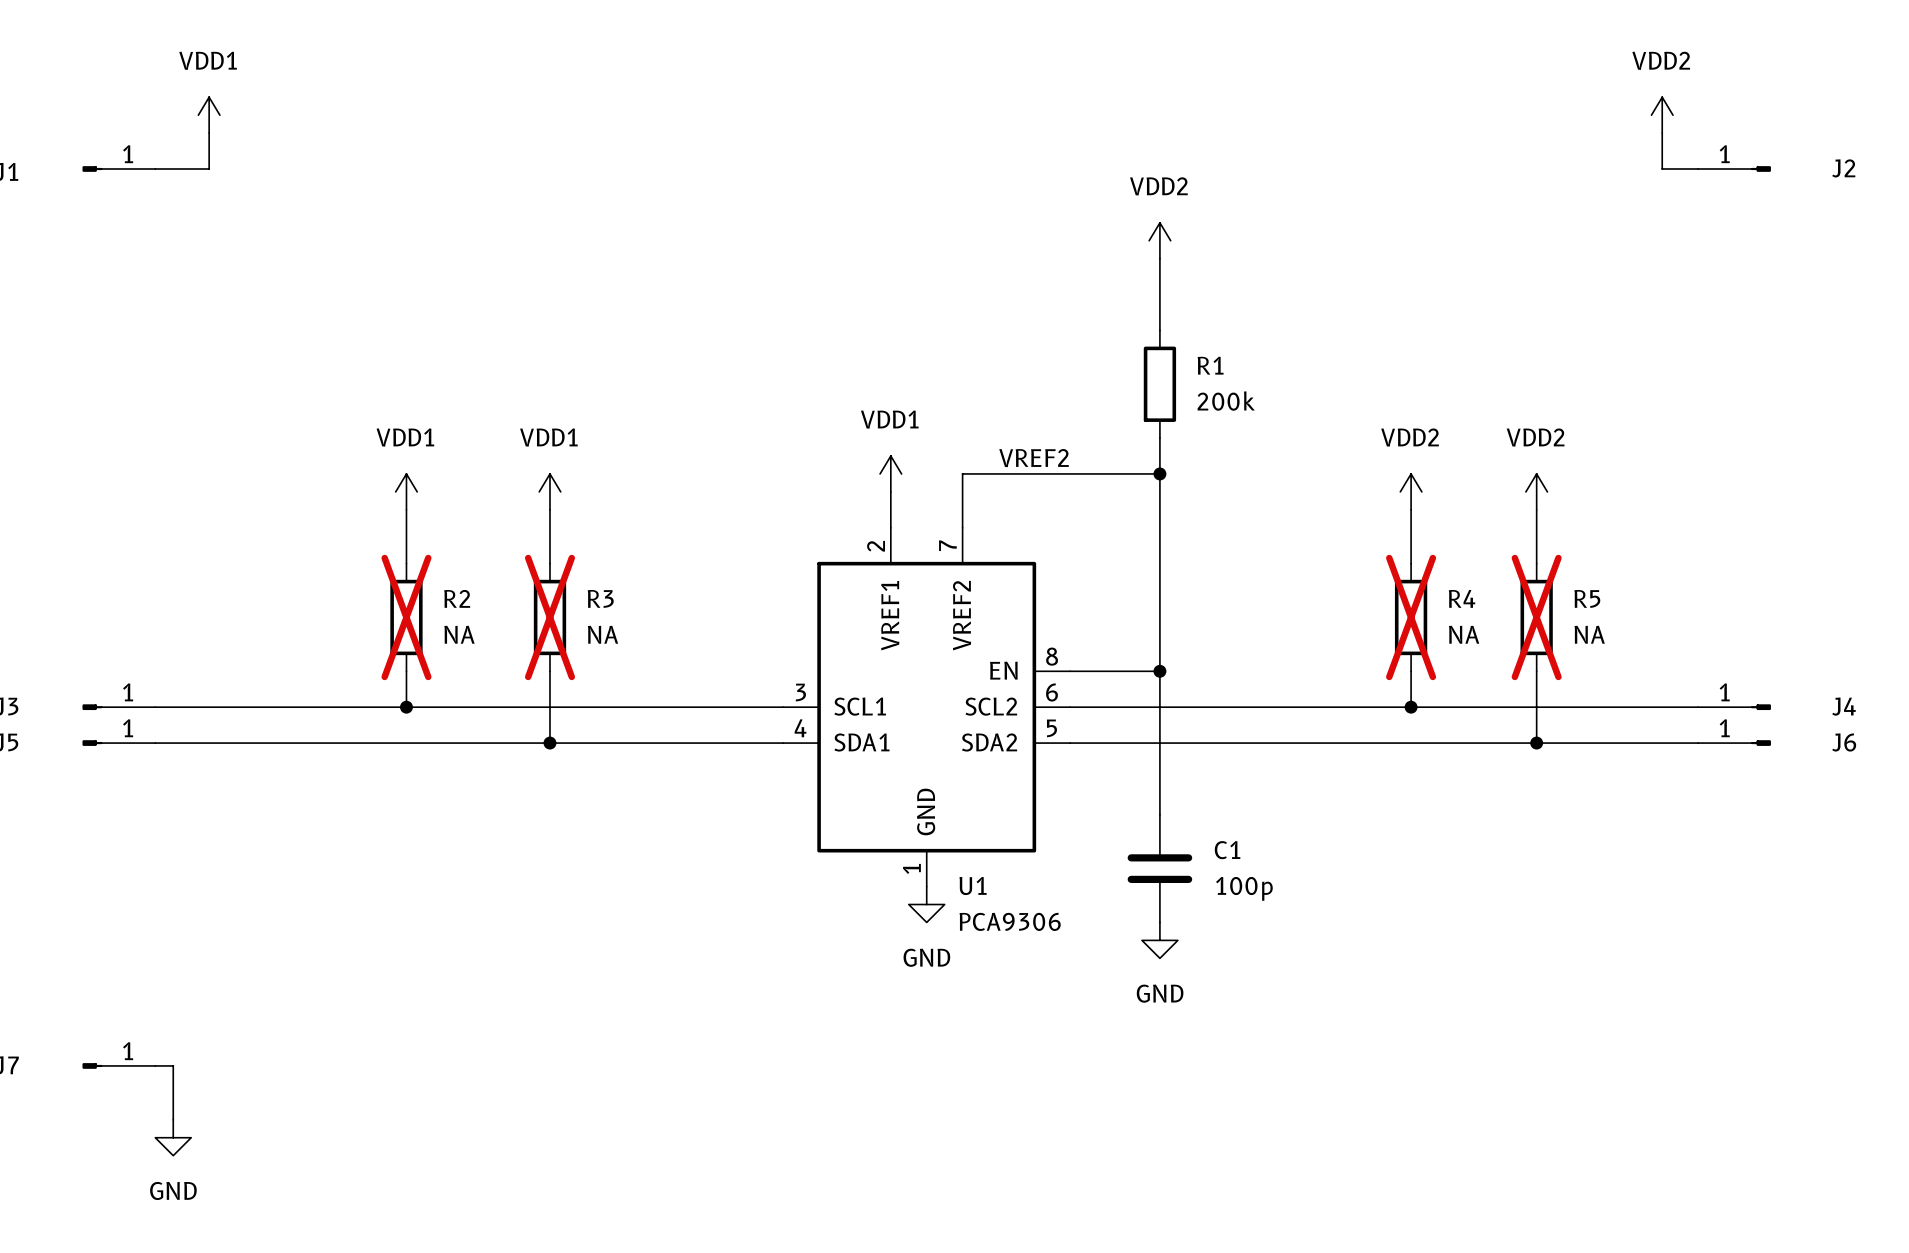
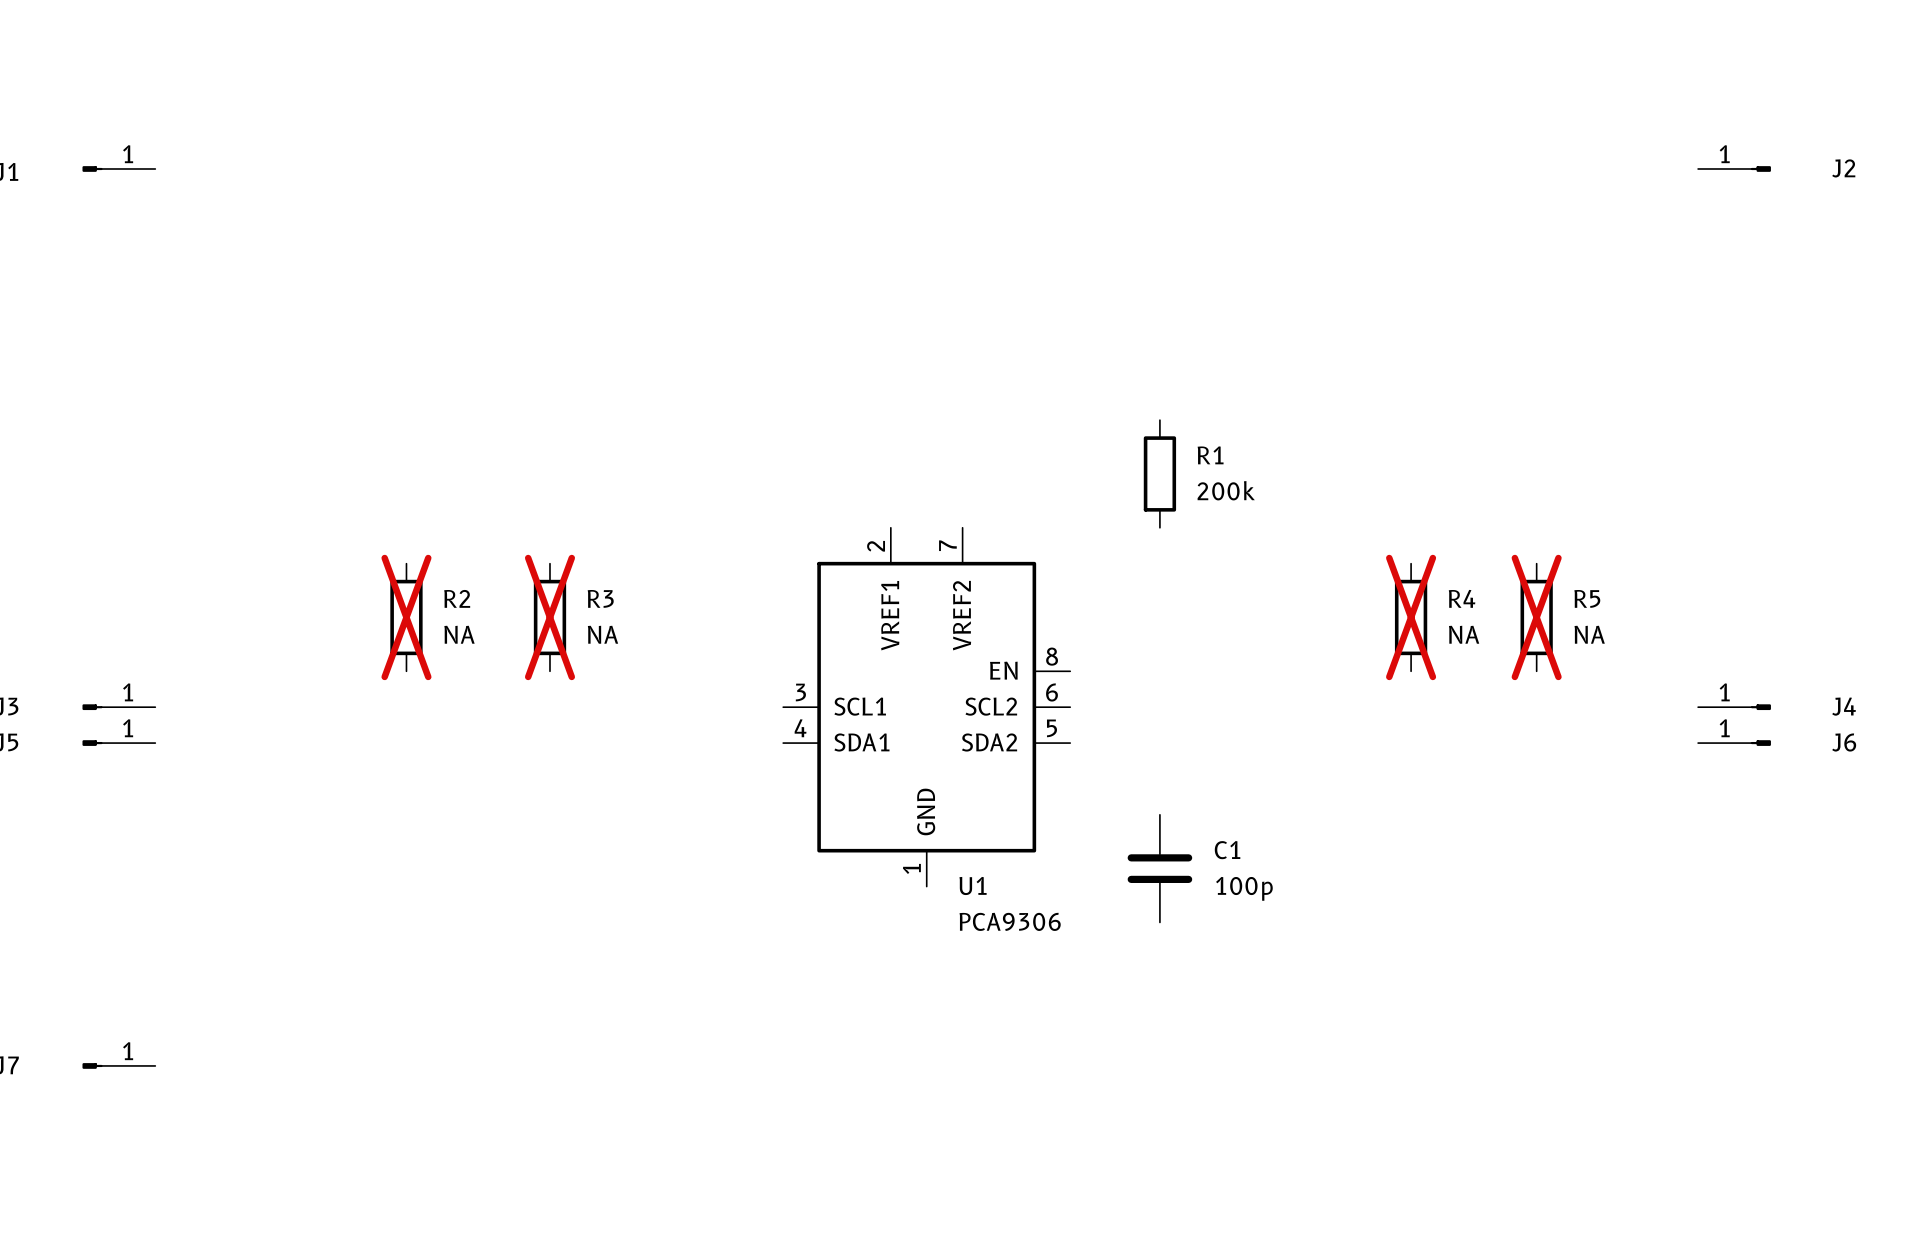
power symbol: VDD1 (209, 115) -> none
power symbol: VDD2 (1662, 115) -> none
wire: (209, 133) (209, 168) (155, 168) -> none
wire: (1662, 133) (1662, 168) (1698, 168) -> none
power symbol: VDD2 (1159, 240) -> none
wire: (1159, 258) (1159, 330) -> none
R1 position: (1159, 384) -> (1159, 473)
wire: (1159, 438) (1159, 814) -> none
label: VREF2 (1034, 458) -> none
power symbol: VDD1 (890, 473) -> none
wire: (1159, 473) (962, 473) (962, 527) -> none
junction: (1159, 473) -> none
power symbol: VDD1 (406, 491) -> none
power symbol: VDD1 (549, 491) -> none
wire: (890, 491) (890, 527) -> none
power symbol: VDD2 (1411, 491) -> none
power symbol: VDD2 (1536, 491) -> none
wire: (406, 509) (406, 563) -> none
wire: (549, 509) (549, 563) -> none
wire: (1411, 509) (1411, 563) -> none
wire: (1536, 509) (1536, 563) -> none
wire: (406, 671) (406, 707) -> none
wire: (549, 671) (549, 743) -> none
wire: (1070, 671) (1159, 671) -> none
junction: (1159, 671) -> none
wire: (1411, 671) (1411, 707) -> none
wire: (1536, 671) (1536, 743) -> none
wire: (155, 707) (783, 707) -> none
junction: (406, 707) -> none
wire: (1070, 707) (1698, 707) -> none
junction: (1411, 707) -> none
wire: (155, 743) (783, 743) -> none
junction: (549, 743) -> none
wire: (1070, 743) (1698, 743) -> none
junction: (1536, 743) -> none
power symbol: GND (926, 904) -> none
power symbol: GND (1159, 940) -> none
wire: (155, 1065) (173, 1065) (173, 1119) -> none
power symbol: GND (173, 1137) -> none

